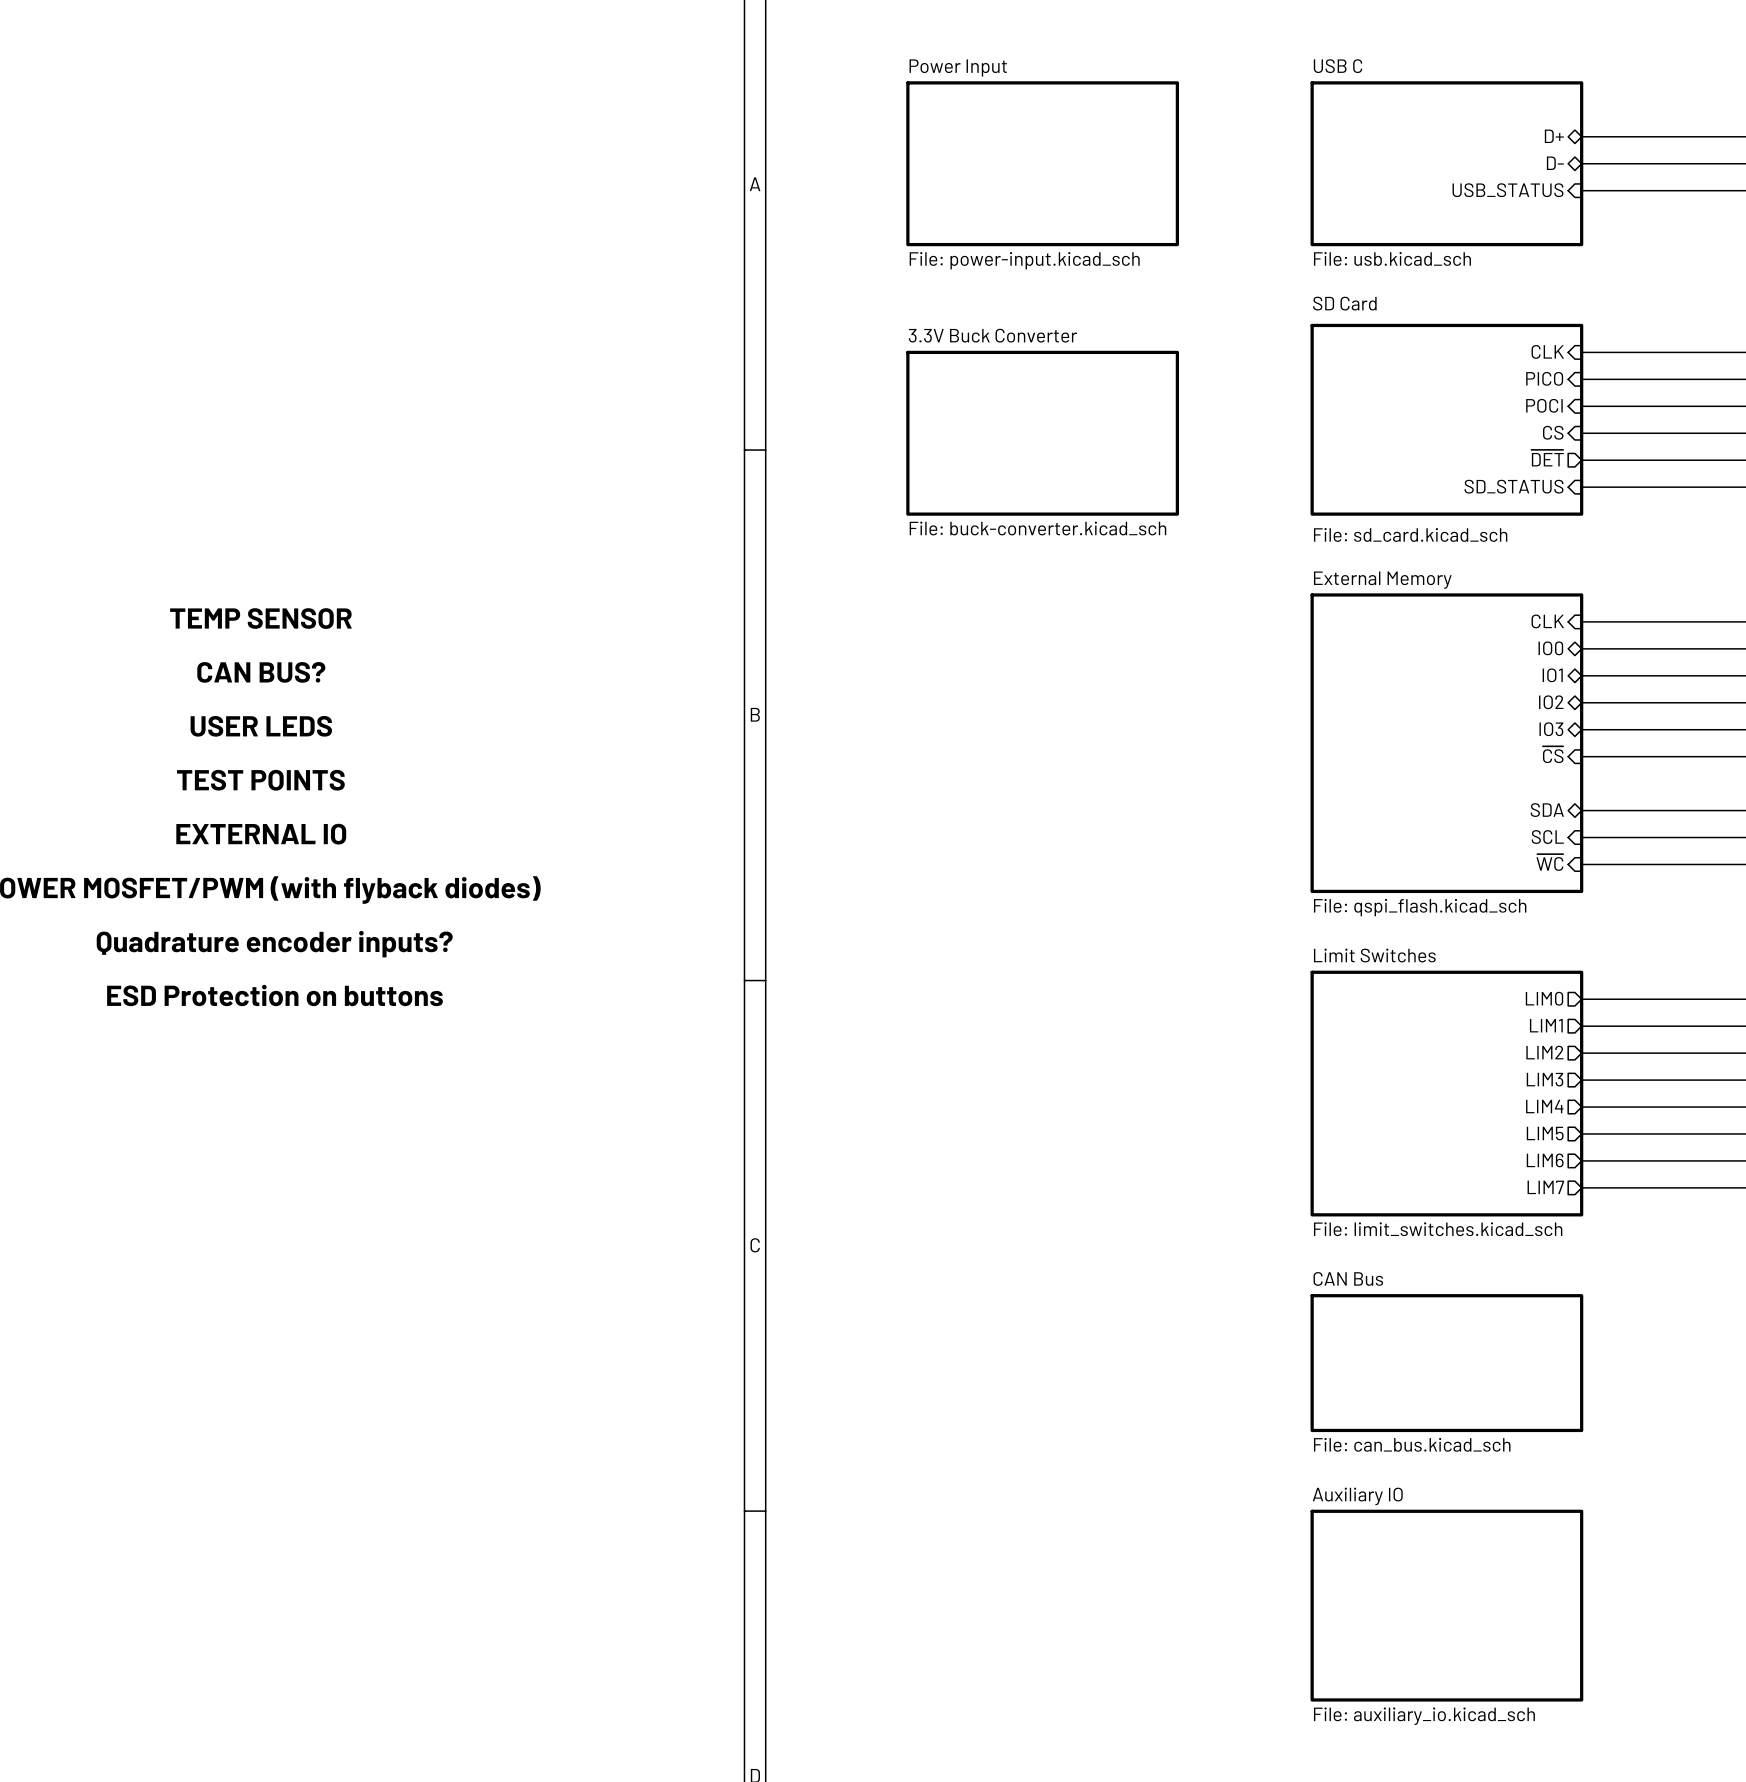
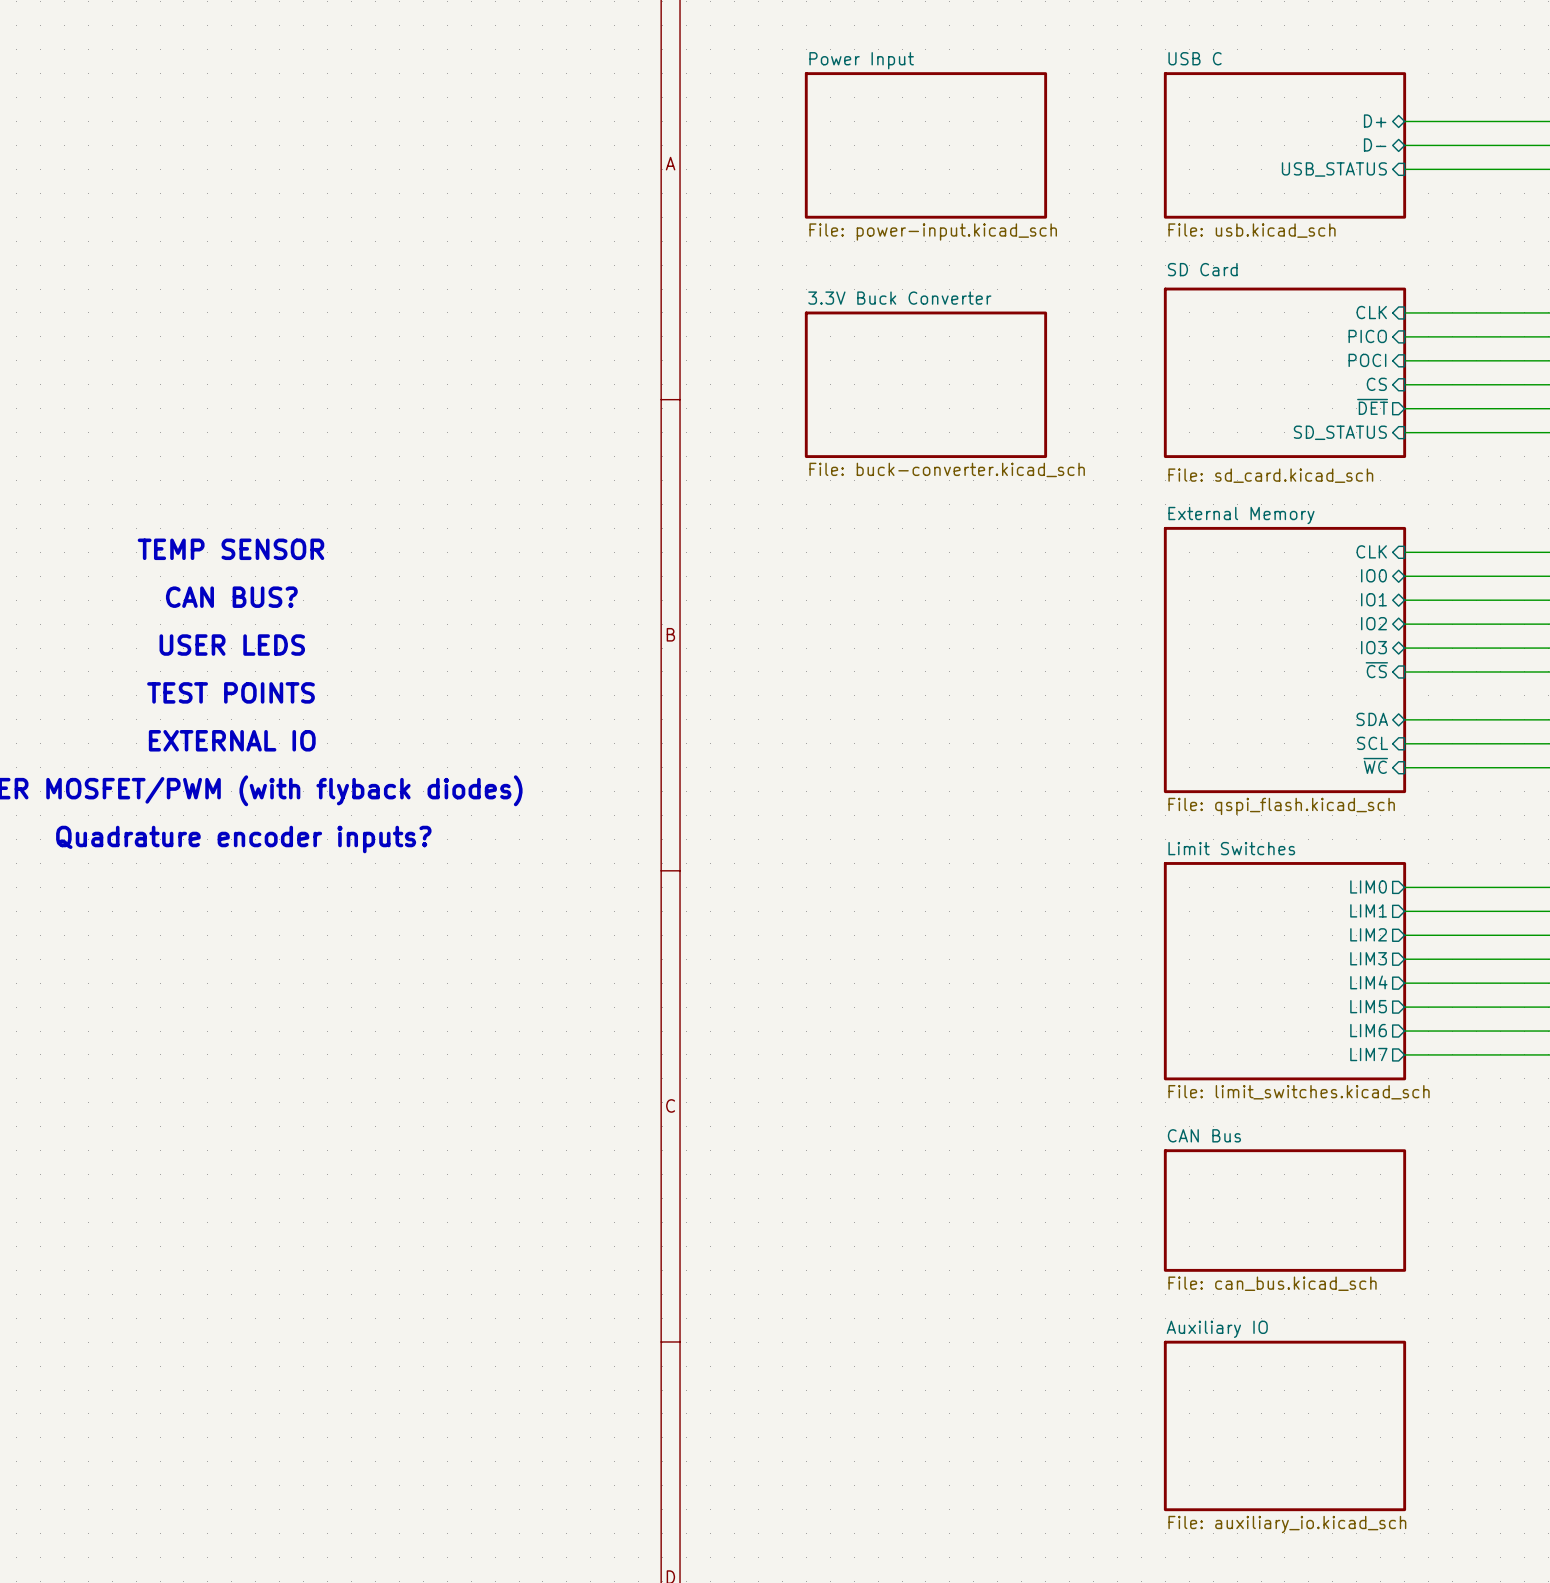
text: ESD Protection on buttons (274, 995) -> none

